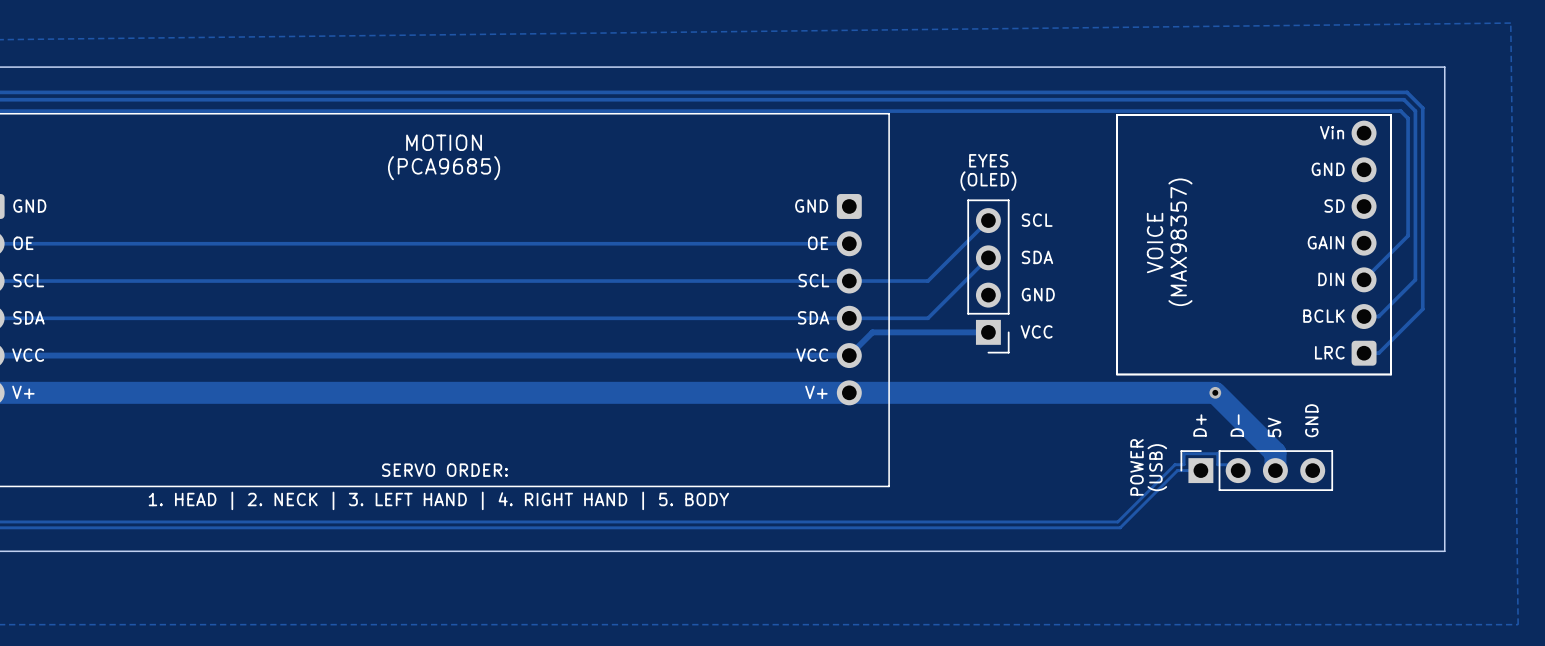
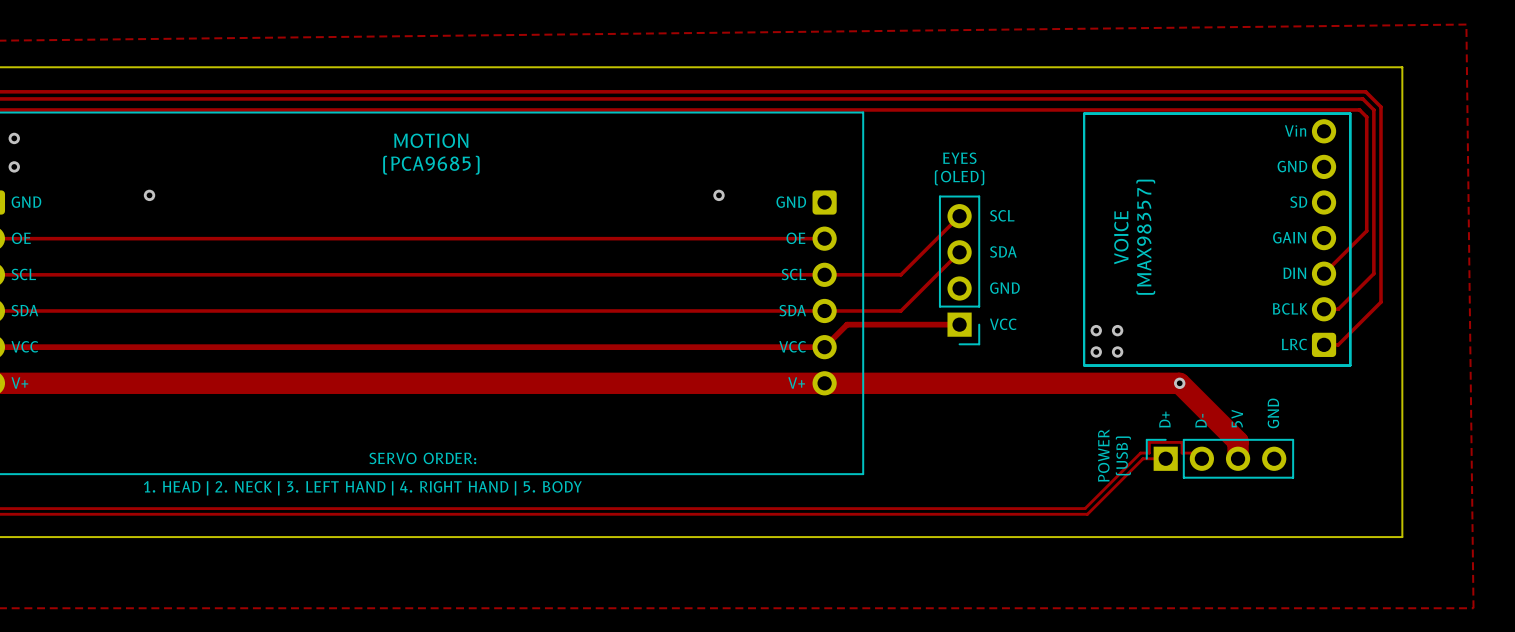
via: none -> (14, 138)
via: none -> (14, 166)
via: none -> (149, 195)
via: none -> (718, 195)
via: none -> (1096, 330)
via: none -> (1117, 330)
via: none -> (1096, 351)
via: none -> (1117, 351)

